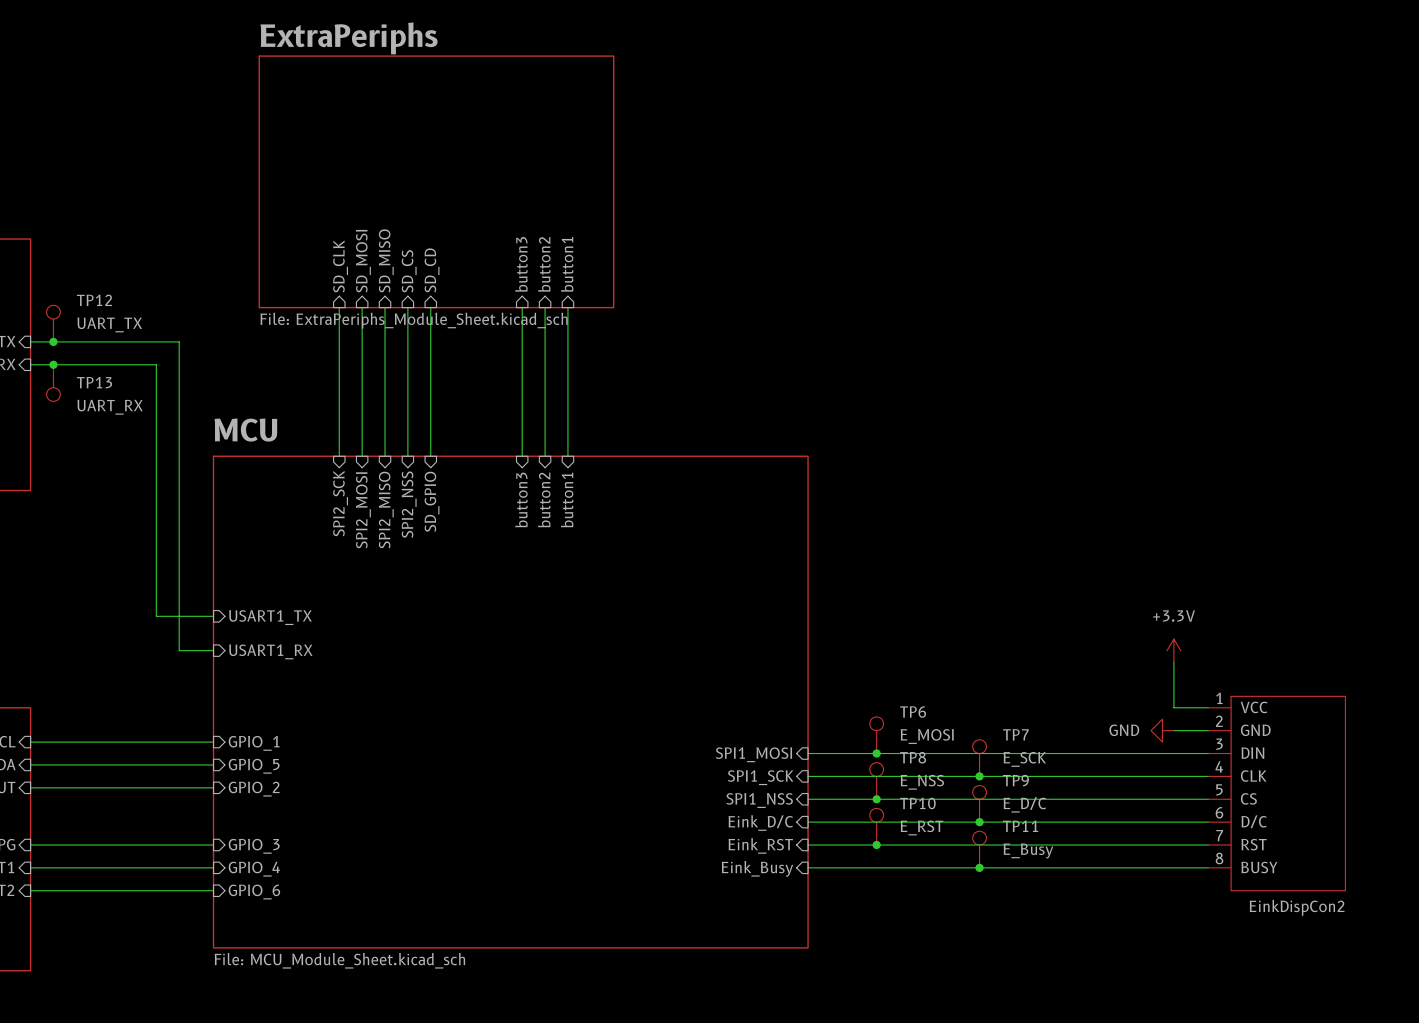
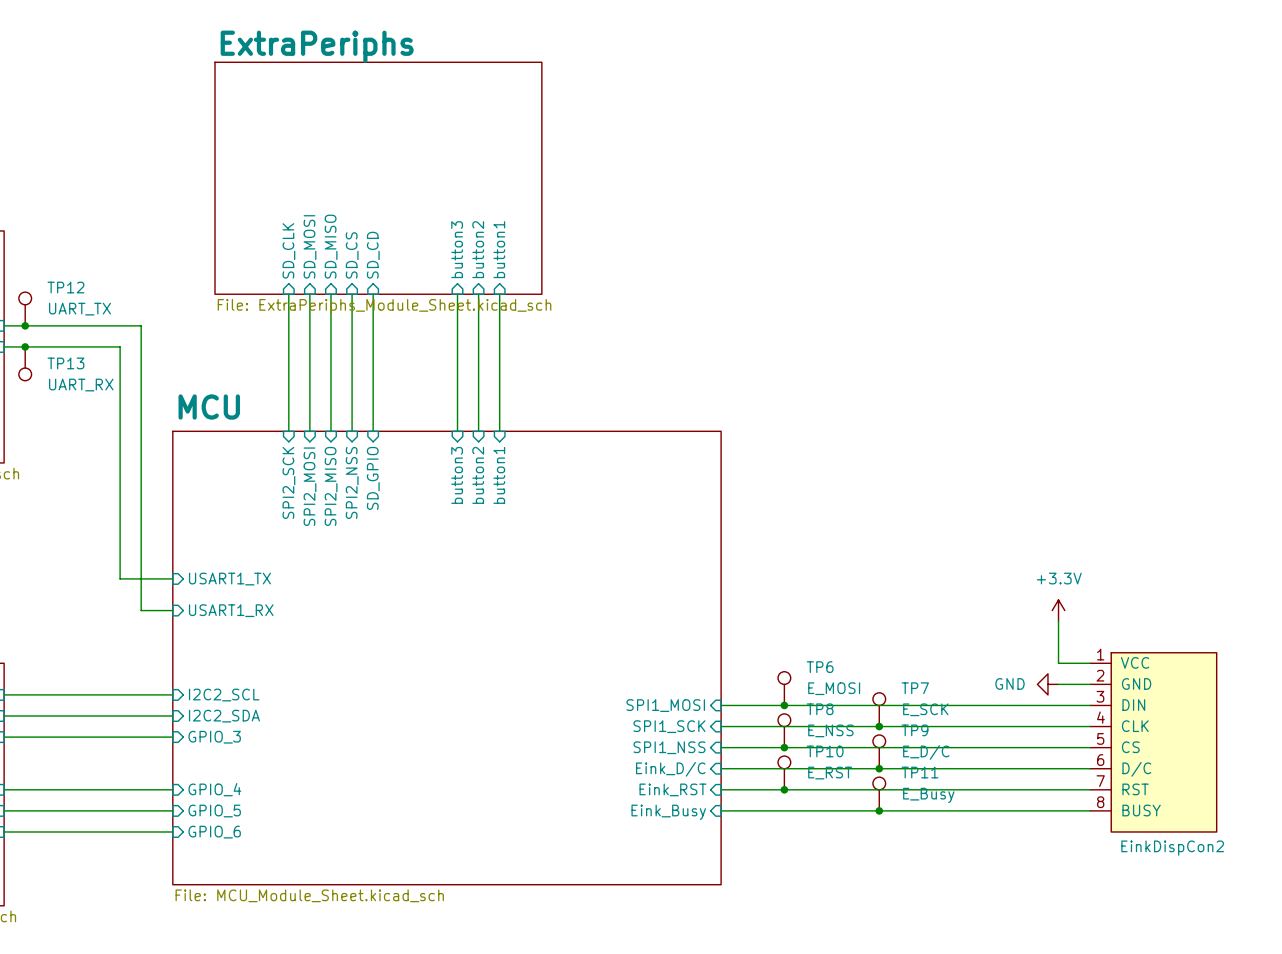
sheet pin: GPIO_1 (254, 743) -> I2C2_SCL (224, 695)
sheet pin: GPIO_5 (254, 766) -> I2C2_SDA (224, 716)
sheet pin: GPIO_2 (254, 789) -> GPIO_3 (214, 737)
sheet pin: GPIO_3 (254, 846) -> GPIO_4 (214, 789)
sheet pin: GPIO_4 (254, 869) -> GPIO_5 (214, 811)

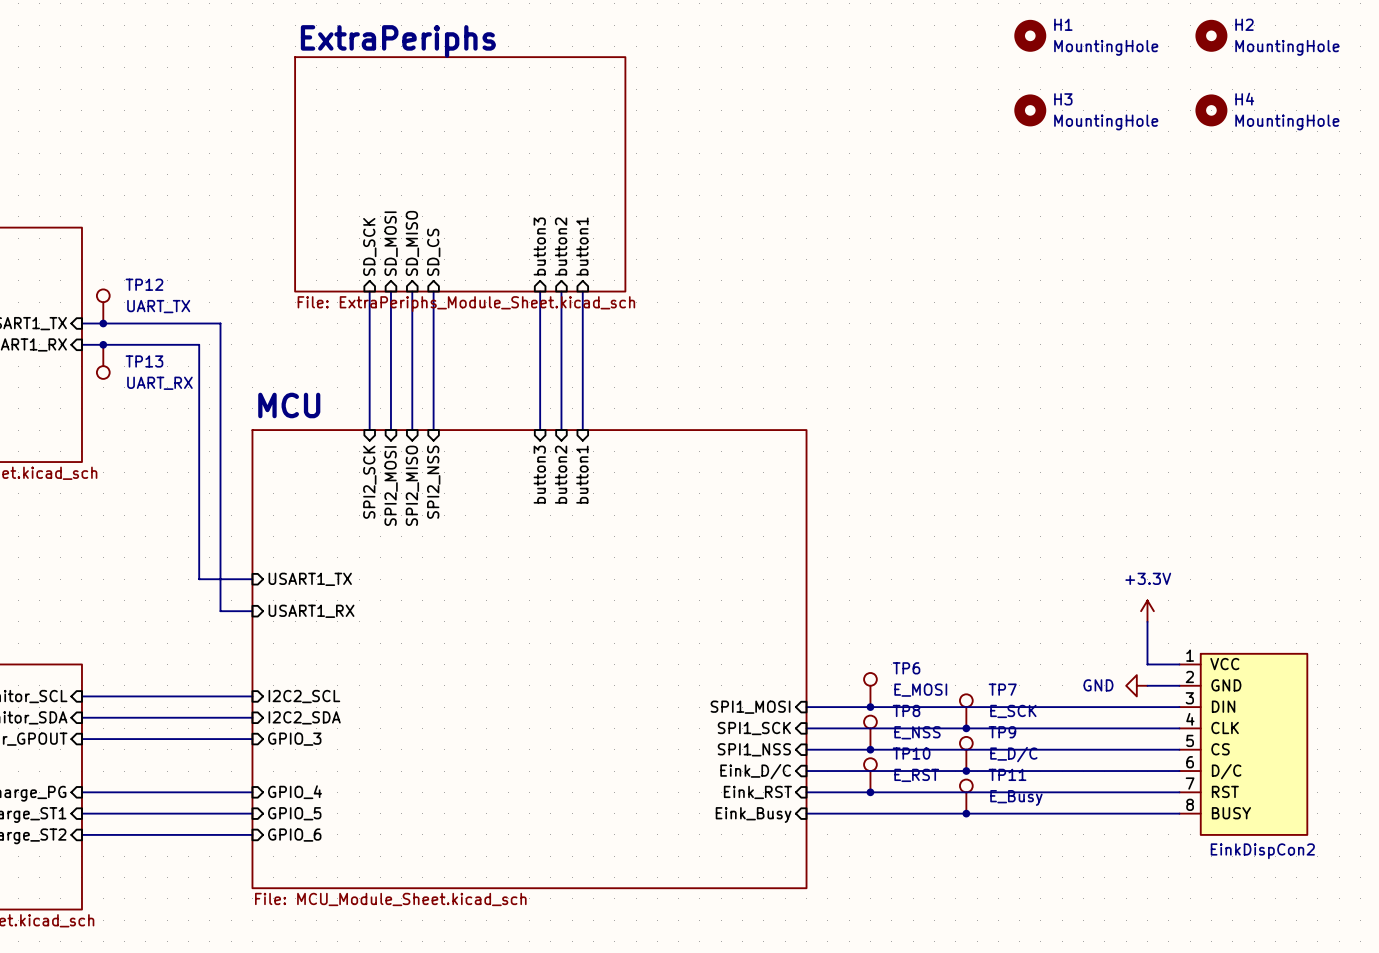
H1: none -> MountingHole (1030, 35)
H2: none -> MountingHole (1211, 35)
H3: none -> MountingHole (1030, 110)
H4: none -> MountingHole (1211, 110)
sheet pin: SD_CLK (288, 250) -> SD_SCK (369, 246)
sheet pin: SD_CD (373, 255) -> none
wire: (373, 294) (373, 431) -> none
sheet pin: SD_GPIO (373, 478) -> none

